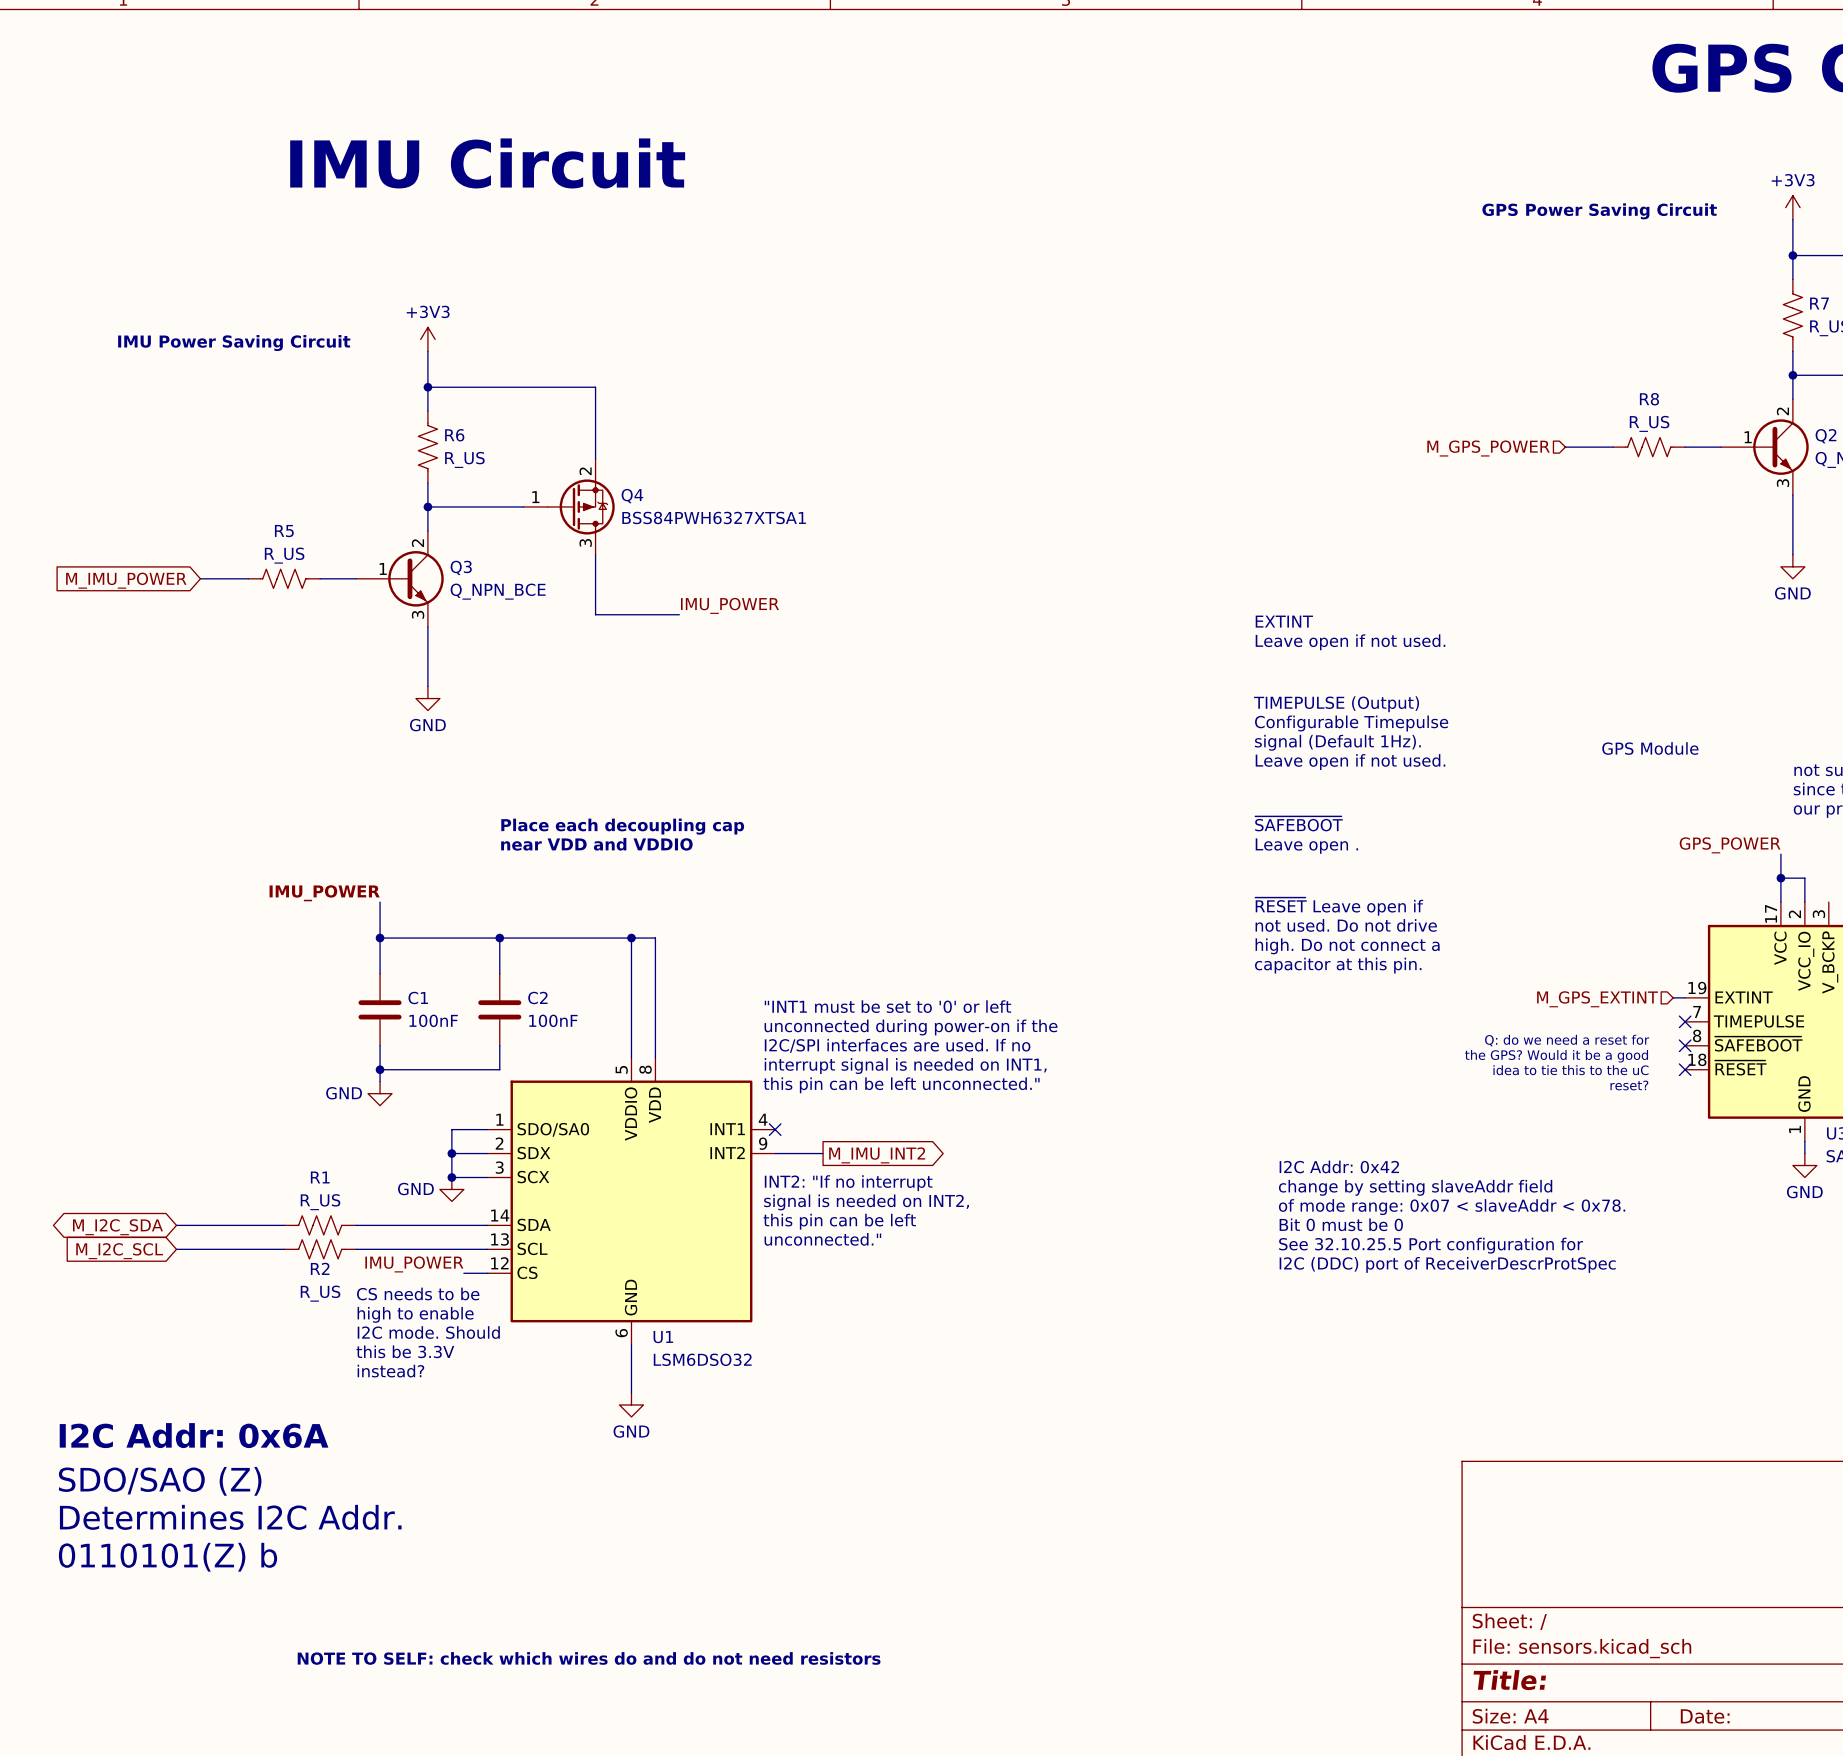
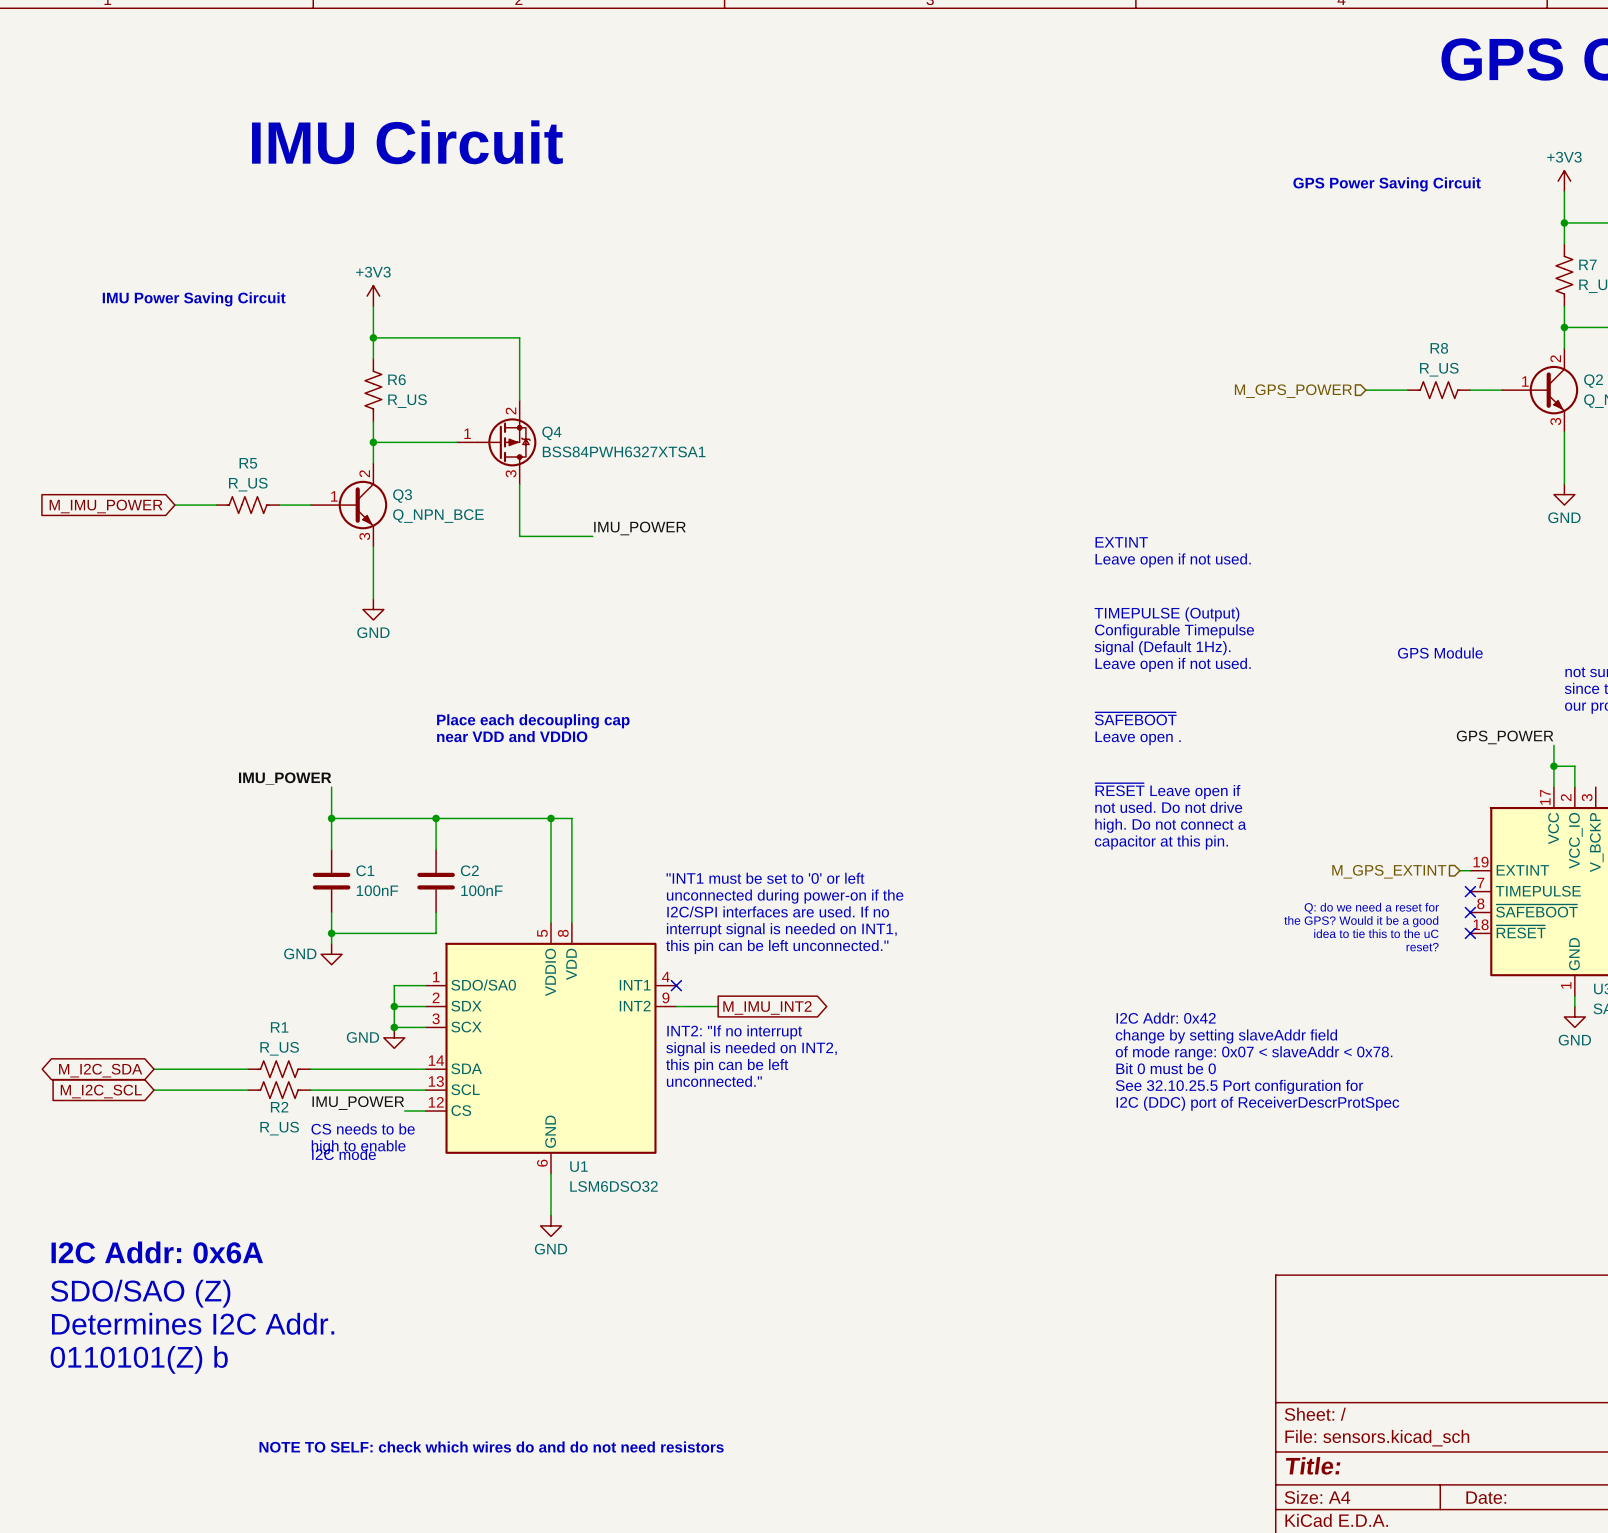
text: I2C mode. Should (428, 1332) -> I2C mode (343, 1154)
text: this be 3.3V (405, 1351) -> none
text: instead? (390, 1371) -> none

